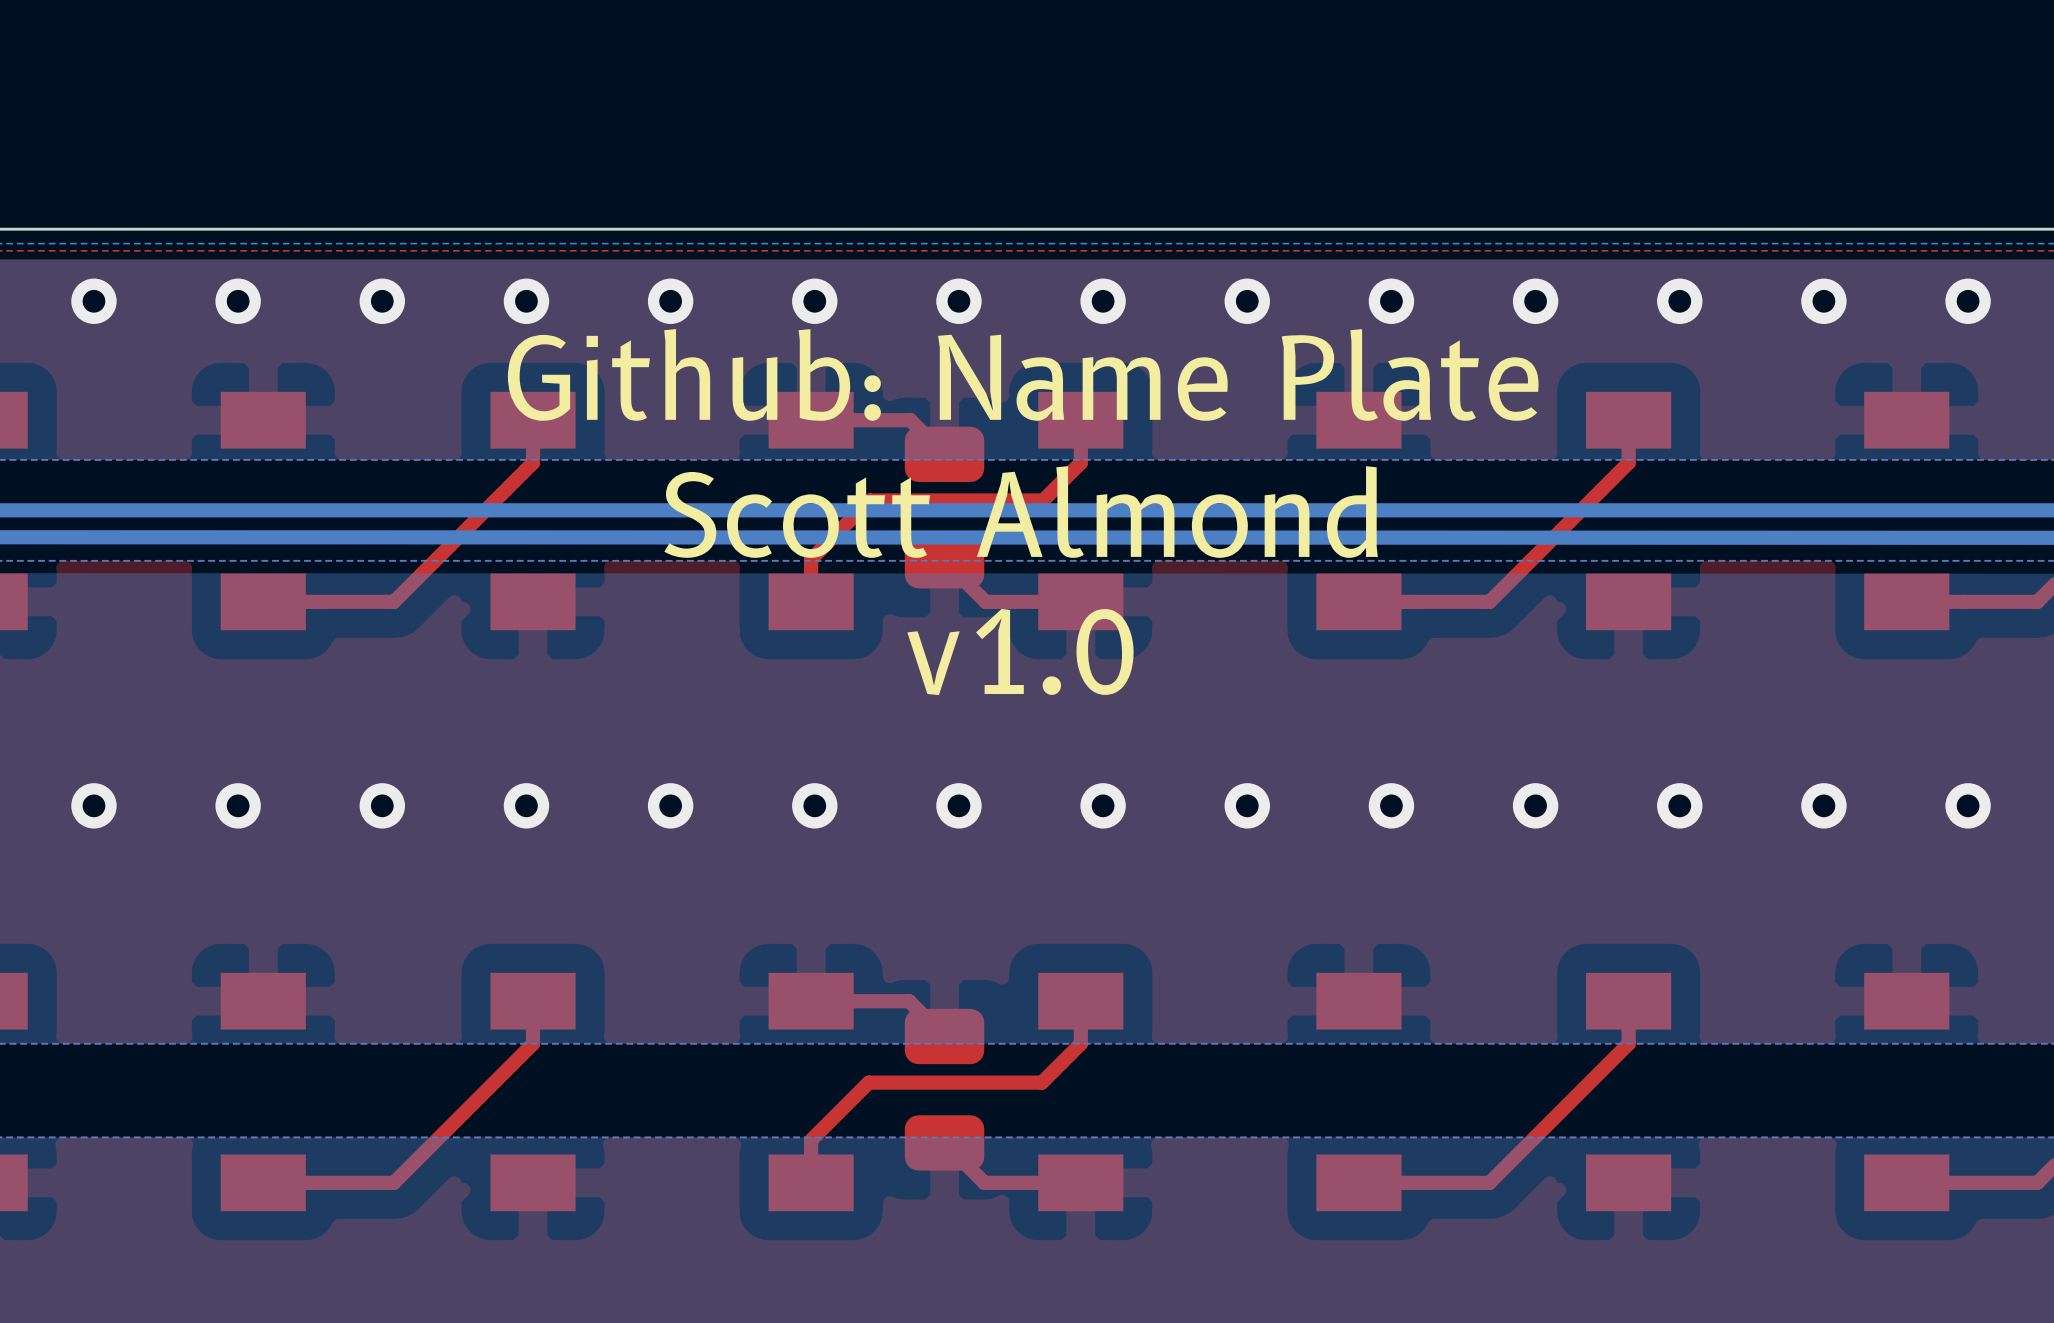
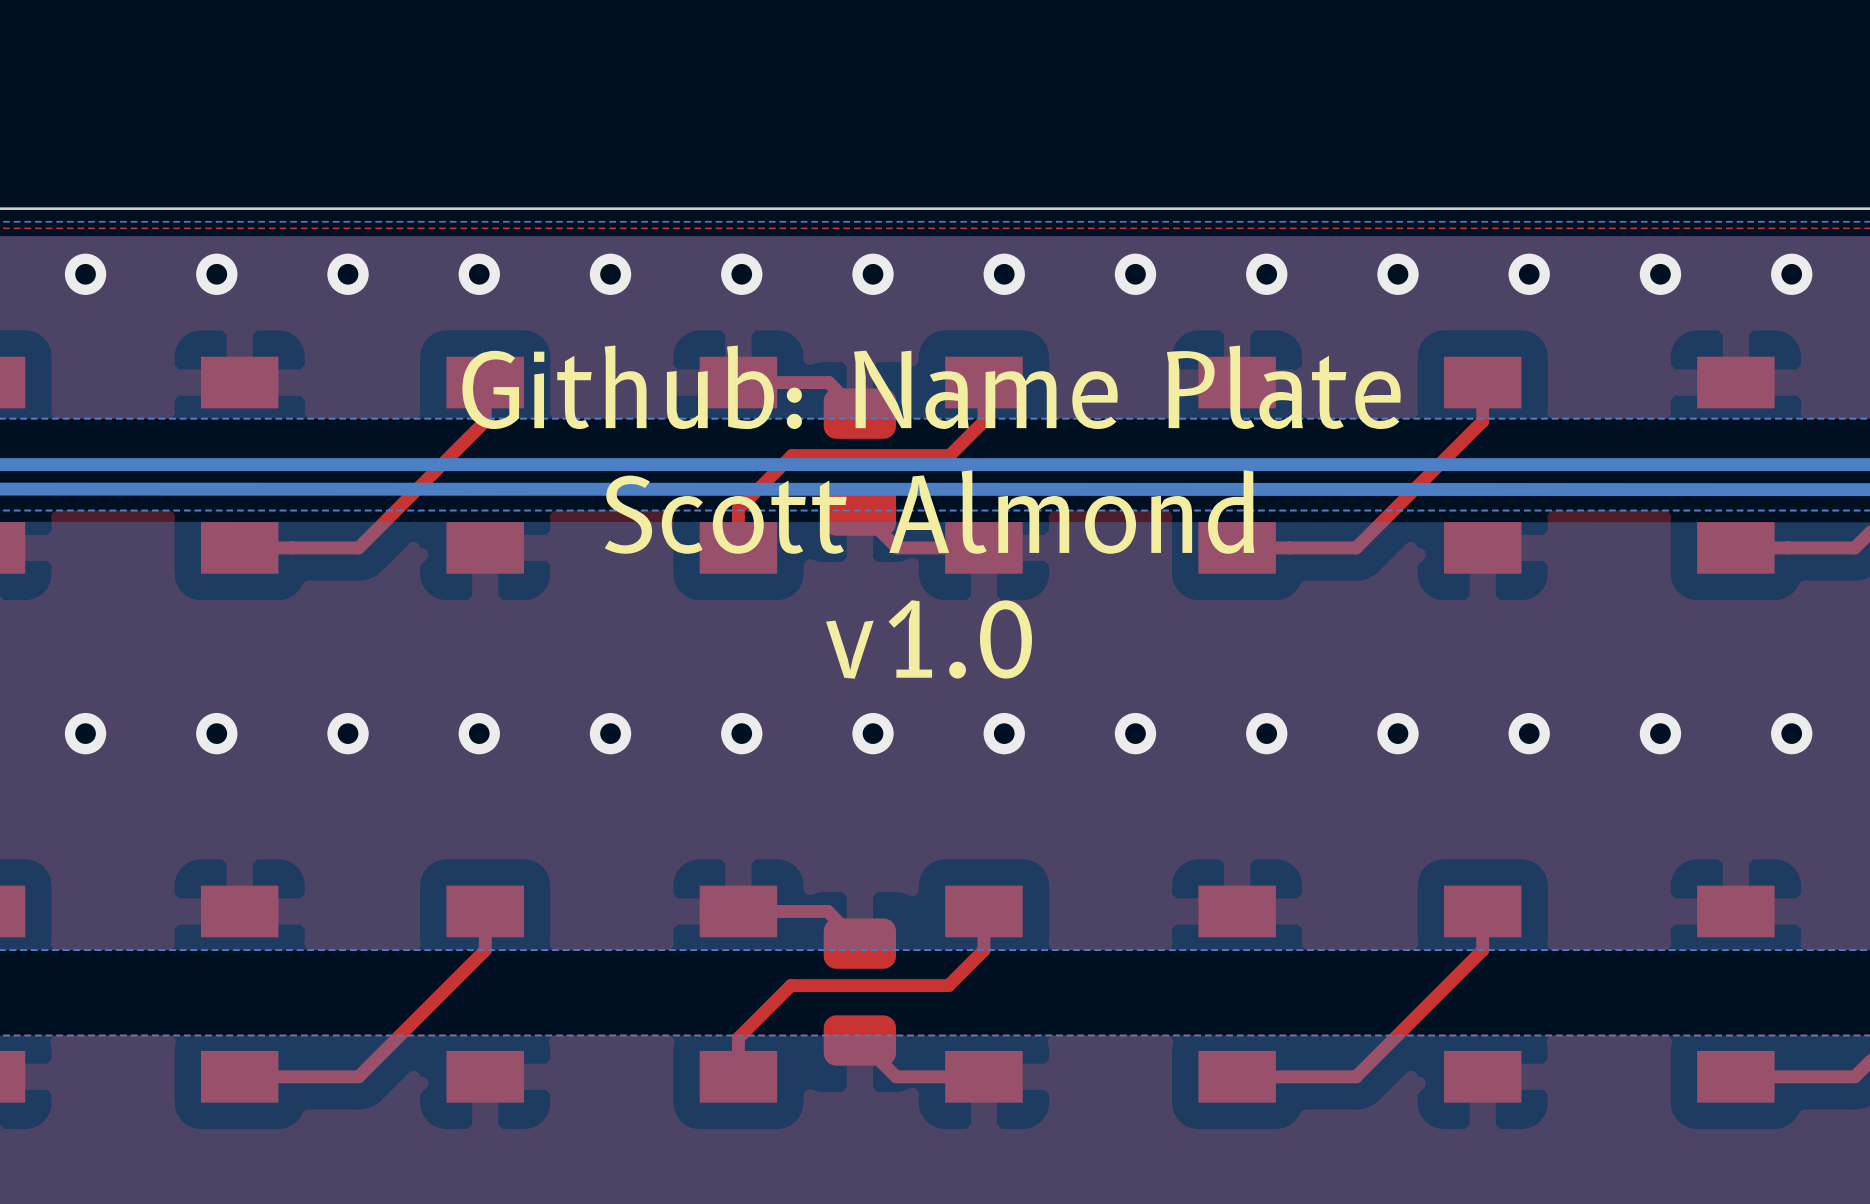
text position: Github: Name Plate (1023, 374) -> Github: Name Plate (931, 387)
text position: Scott Almond (1021, 512) -> Scott Almond (929, 512)
text position: v1.0 (1020, 651) -> v1.0 (929, 639)

